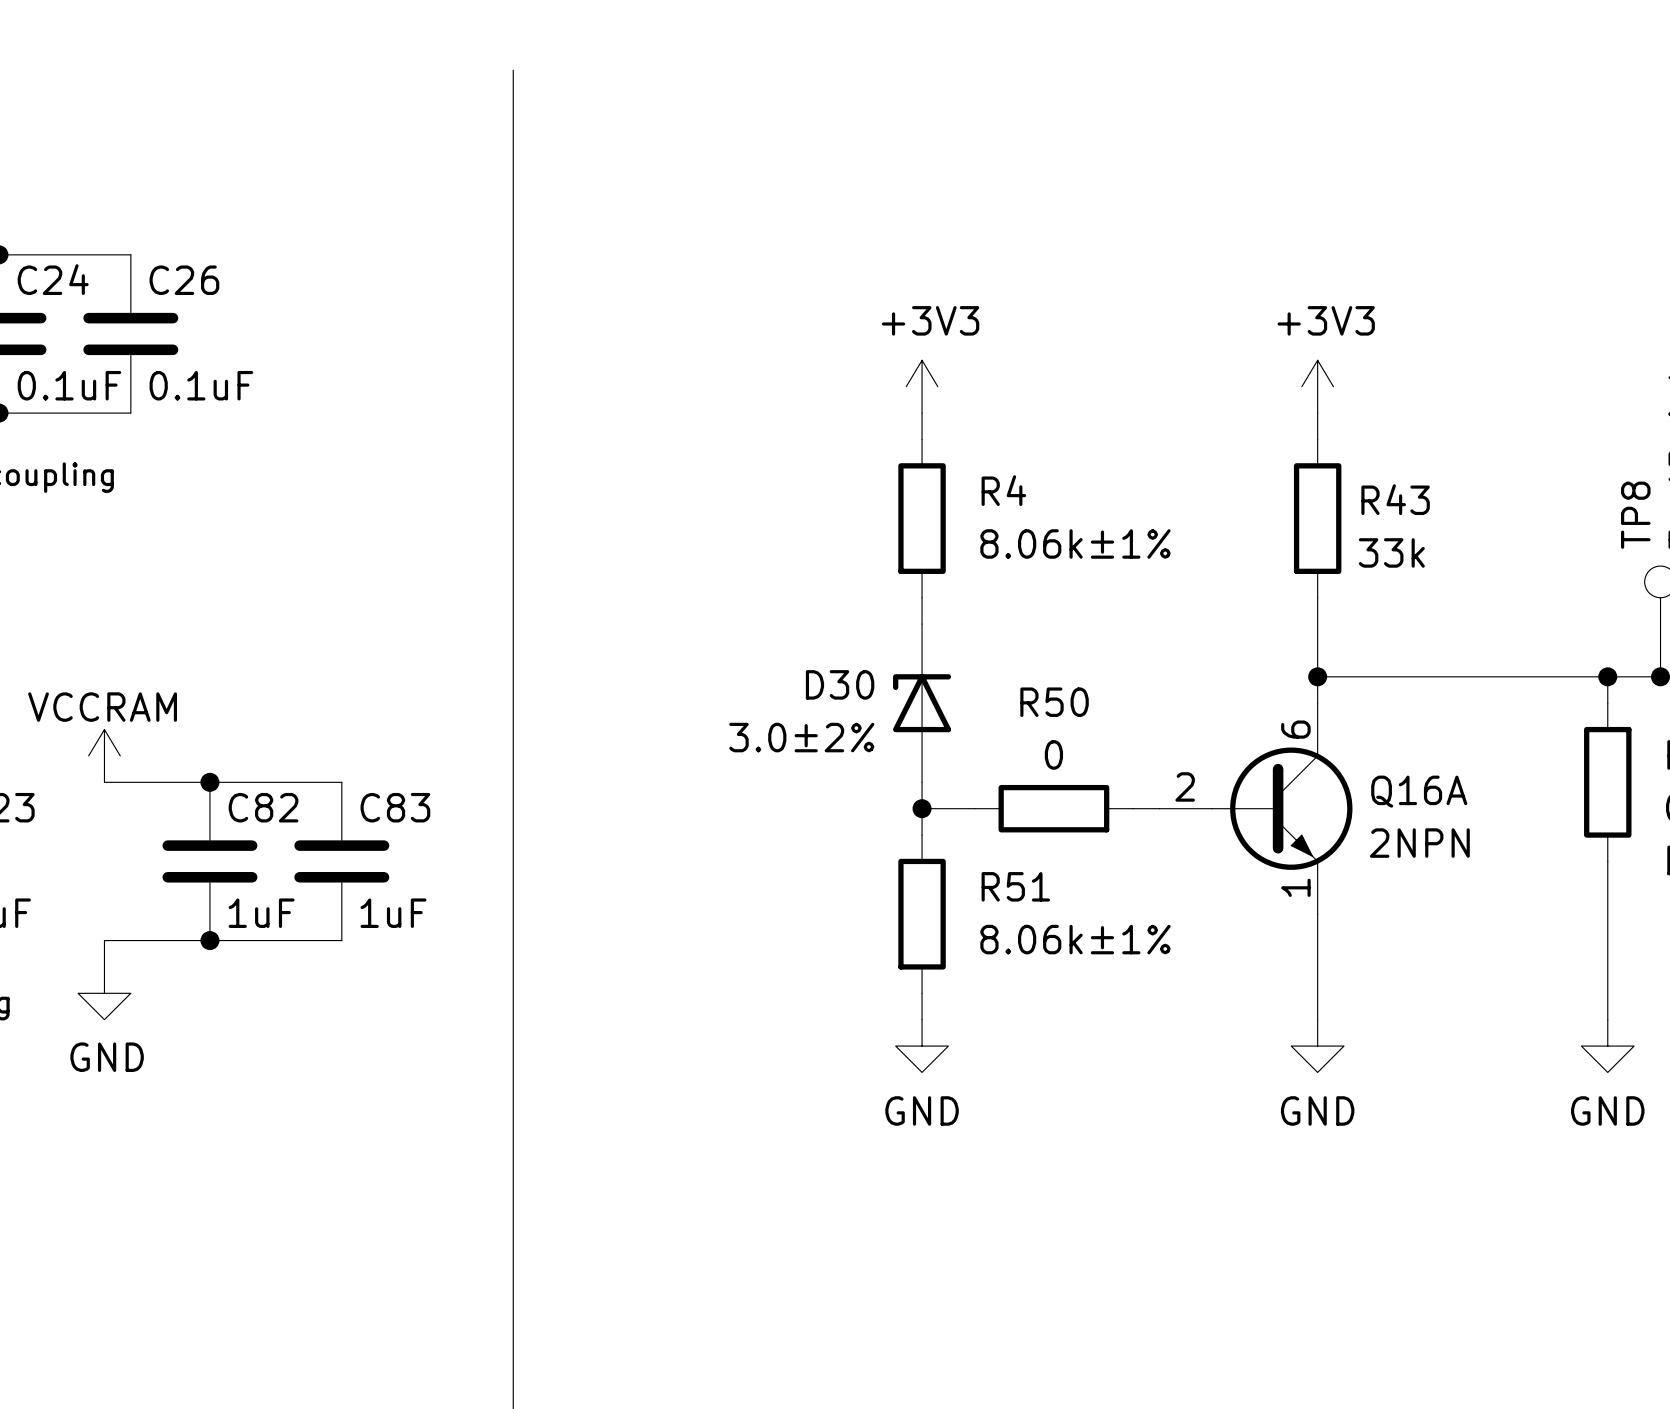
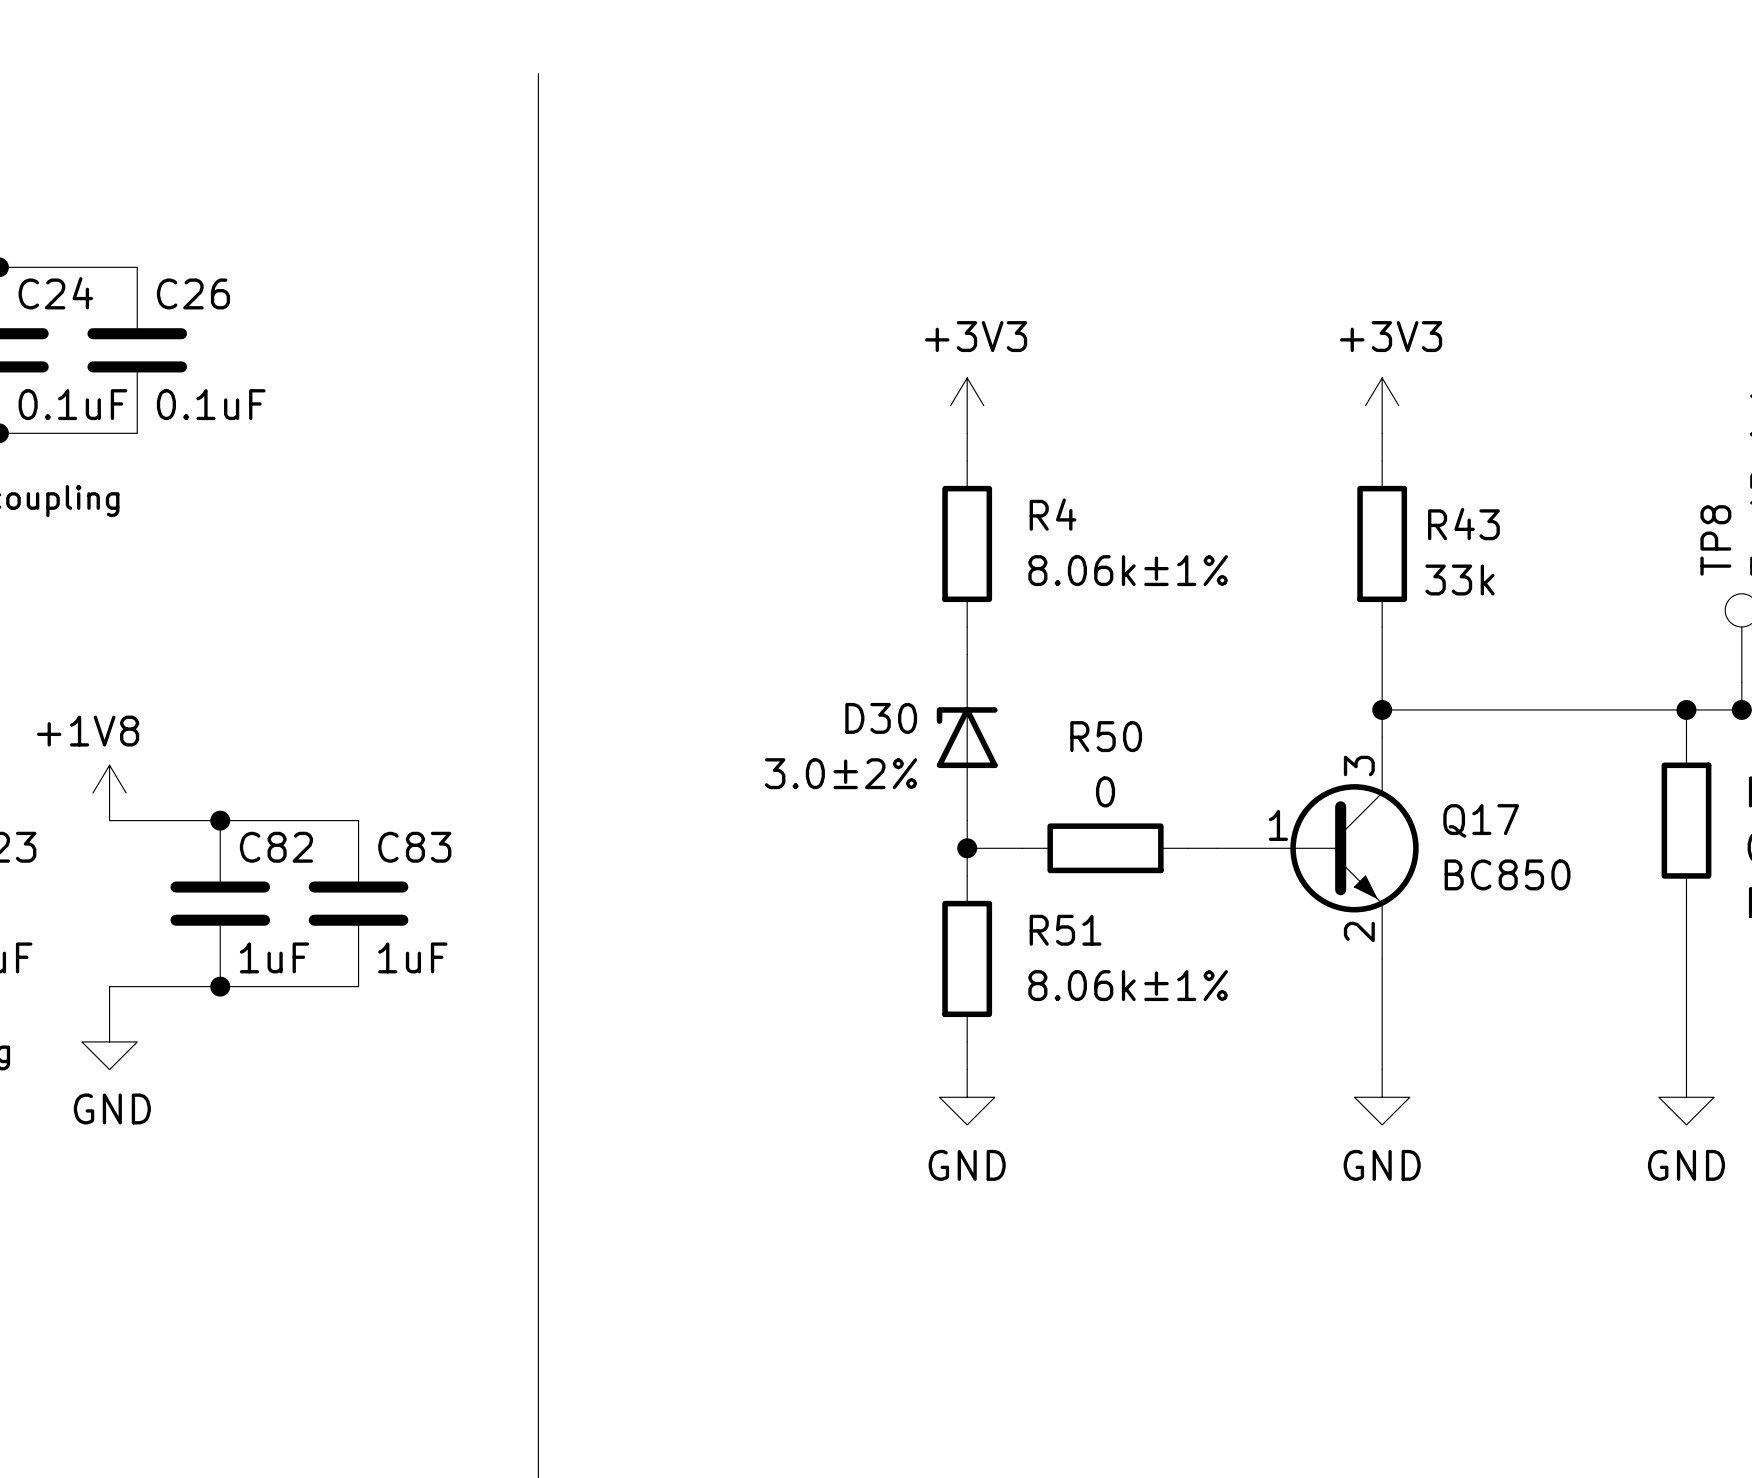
power symbol: VCCRAM (104, 755) -> +1V8 (109, 792)
Q16A: 2NPN (1255, 808) -> none
Q17: none -> BC850 (1317, 848)

